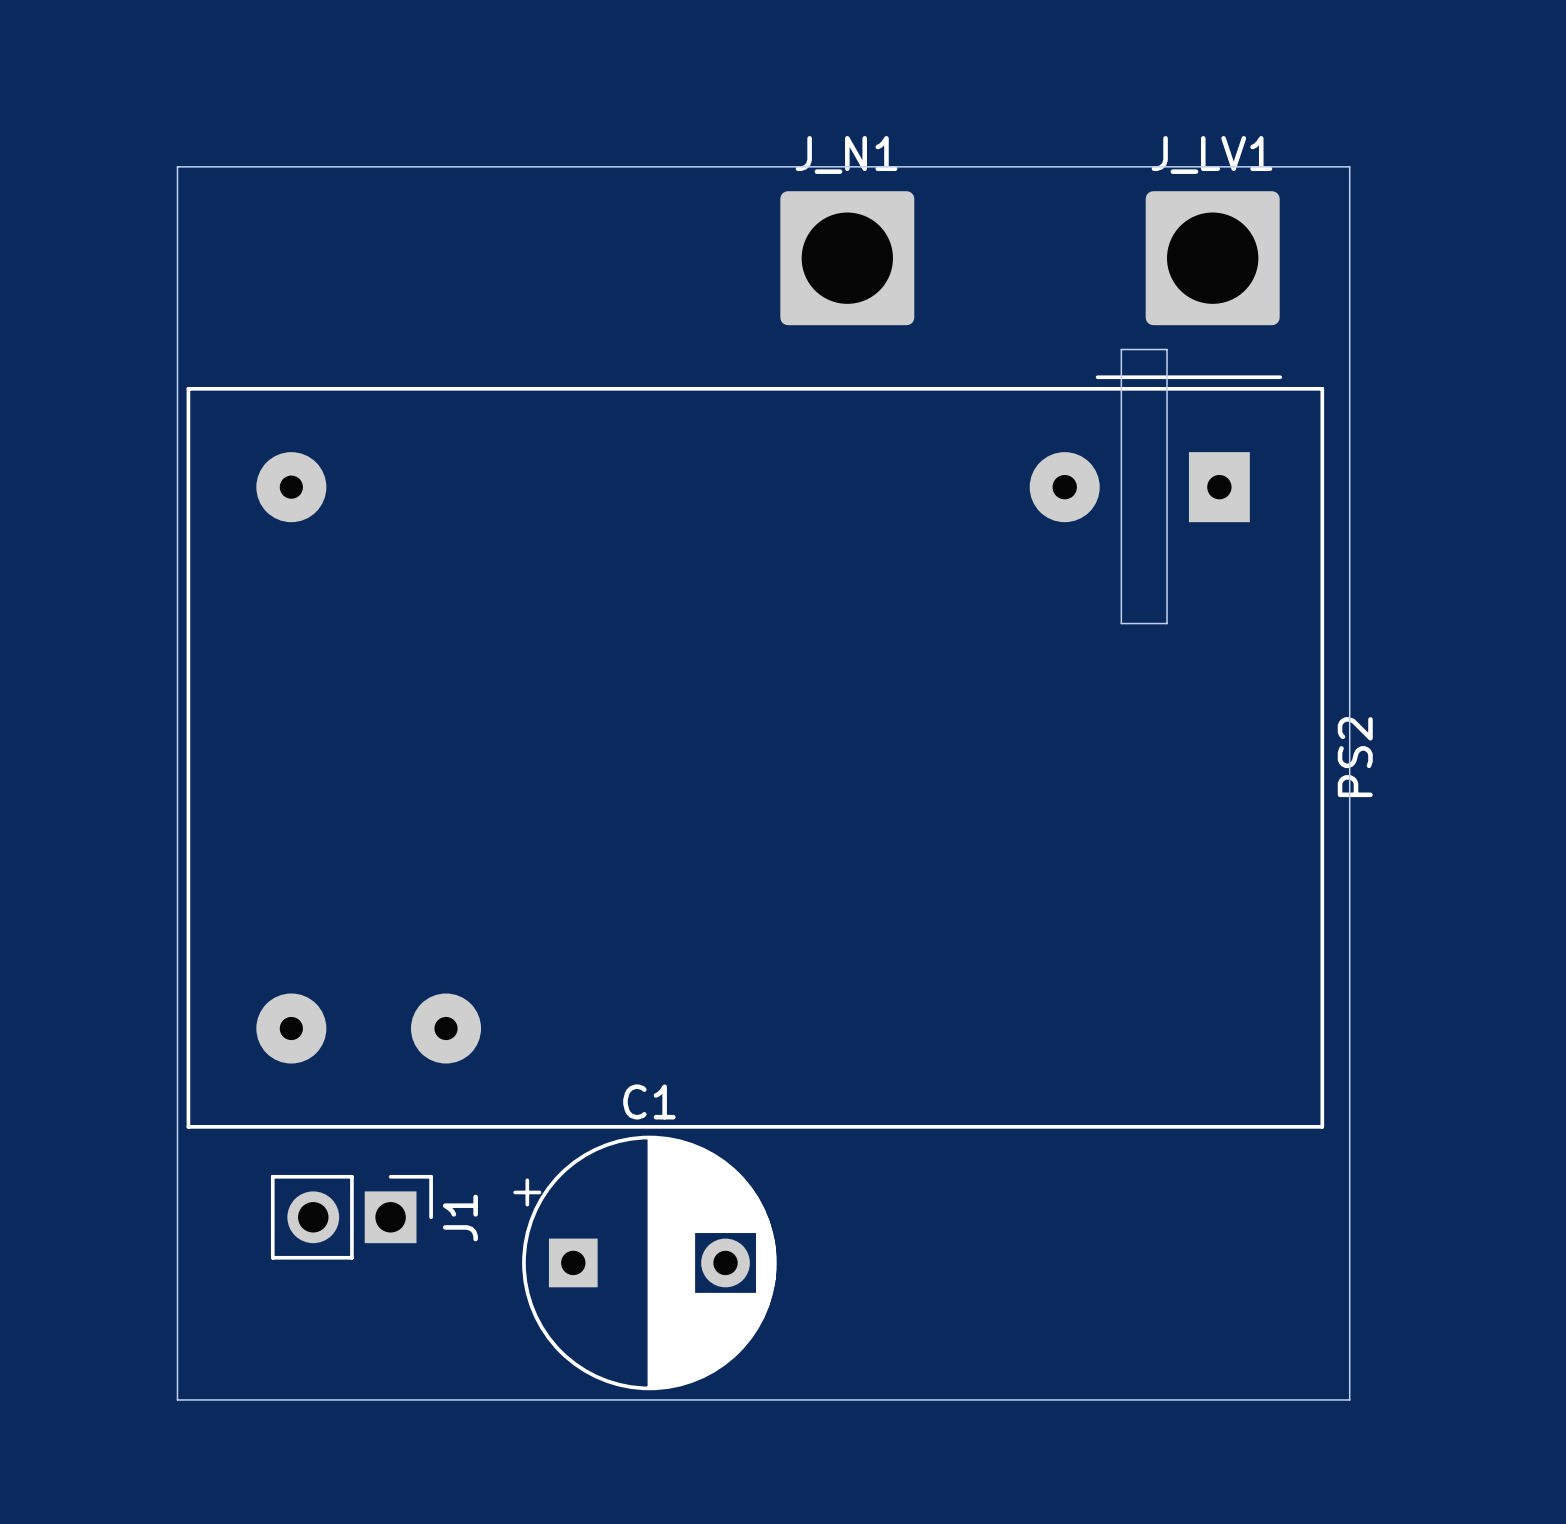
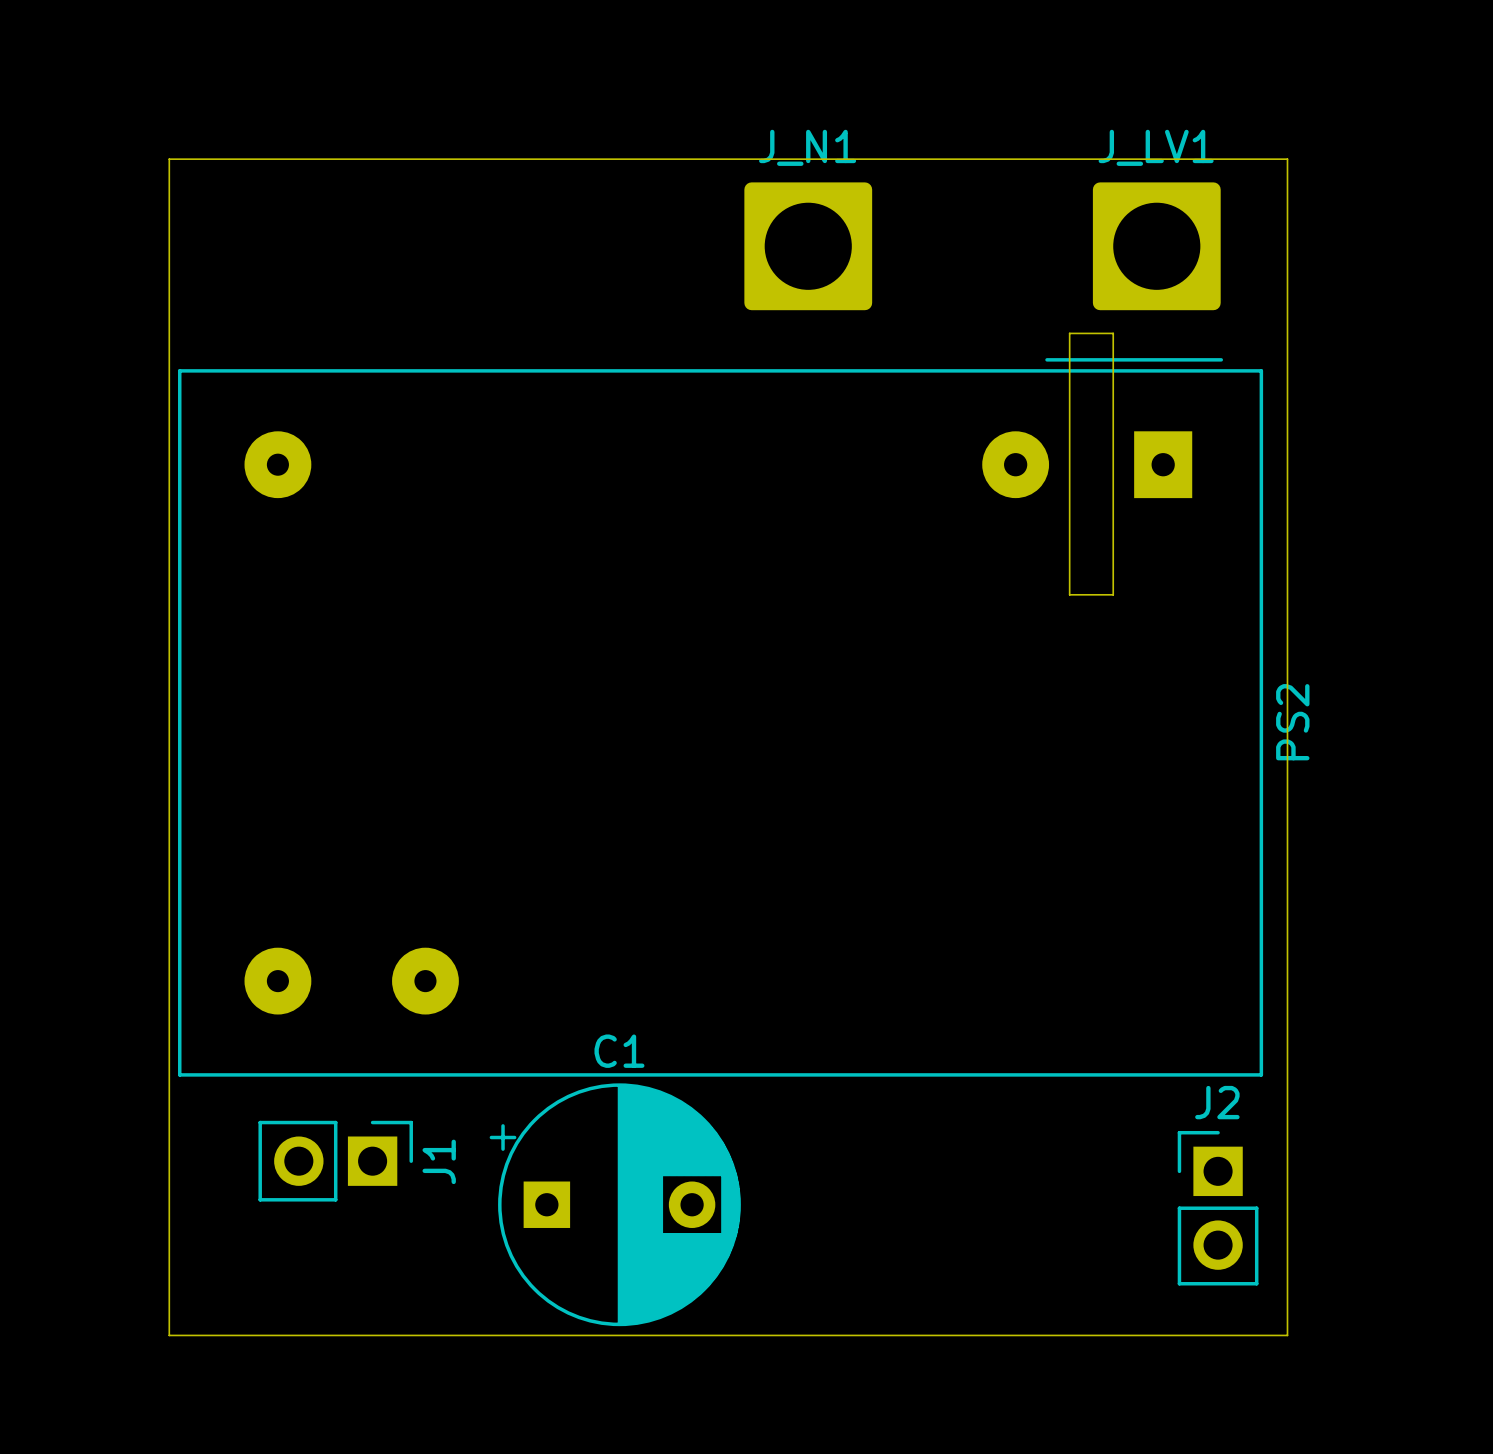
J2: none -> (1218, 1208)

